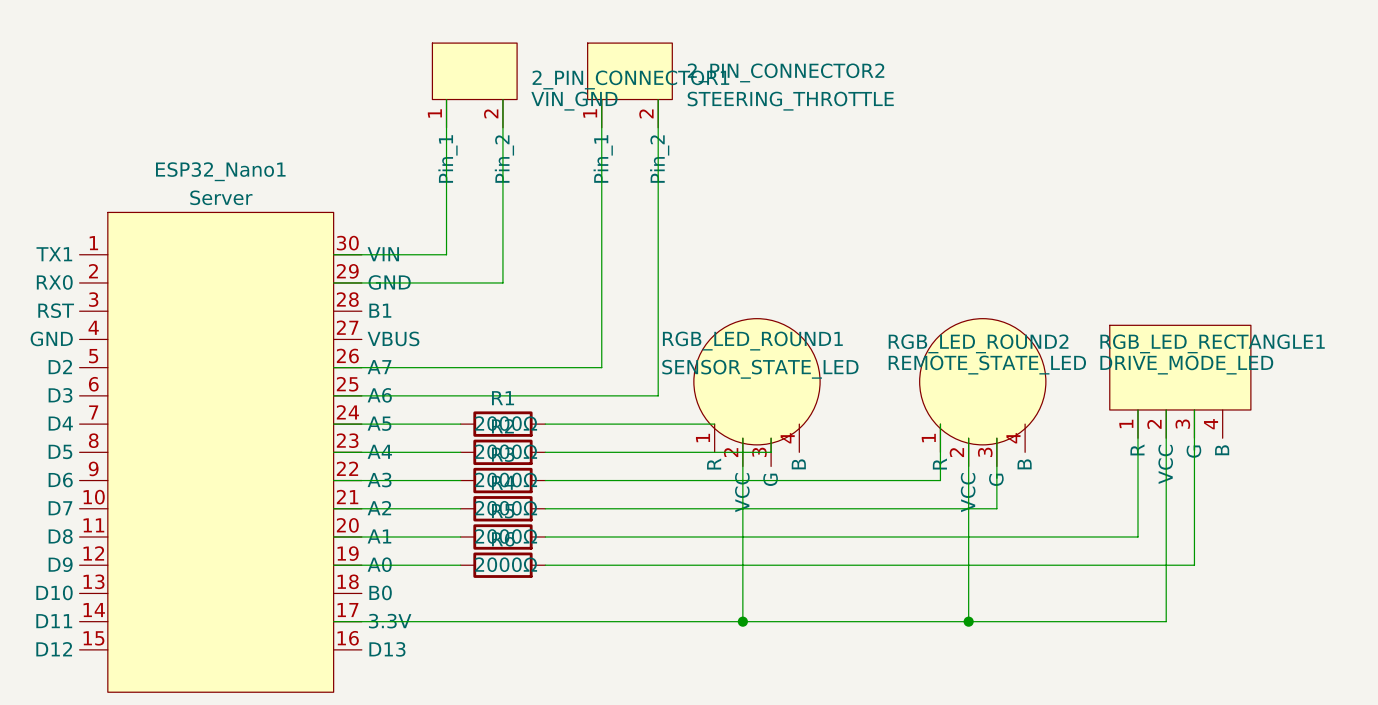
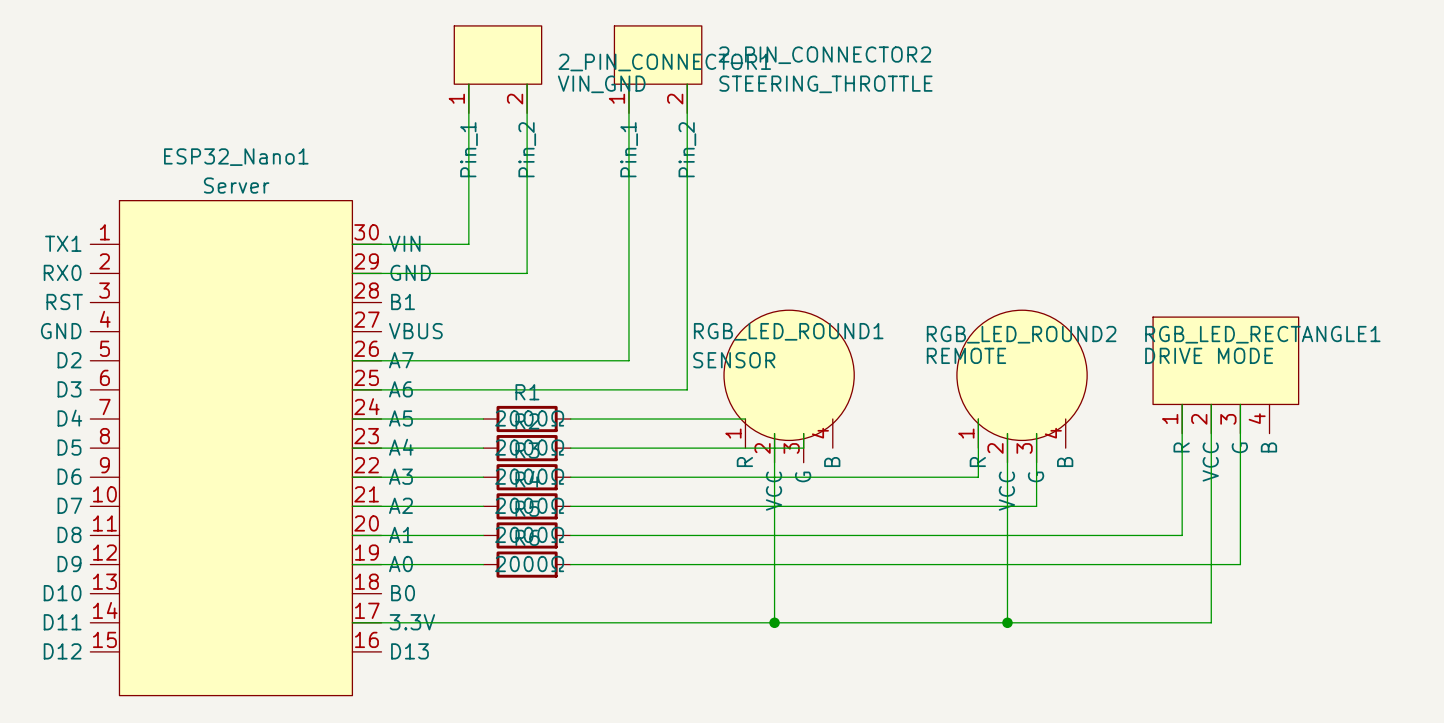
RGB_LED_ROUND2 value: REMOTE_STATE_LED (987, 365) -> REMOTE (966, 355)
RGB_LED_RECTANGLE1 value: DRIVE_MODE_LED (1186, 365) -> DRIVE MODE (1209, 355)
RGB_LED_ROUND1 value: SENSOR_STATE_LED (760, 369) -> SENSOR (734, 360)

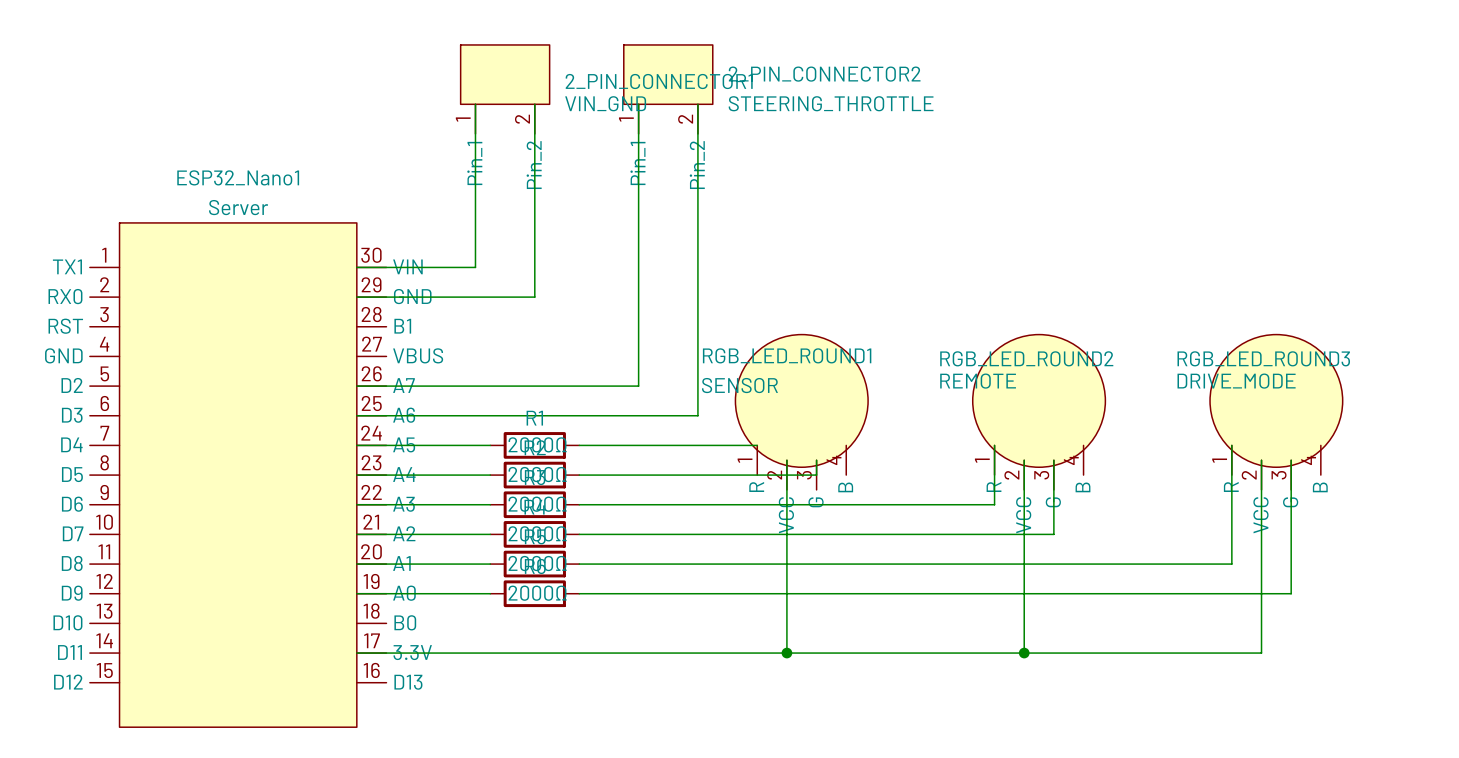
RGB_LED_RECTANGLE1: DRIVE MODE (1225, 375) -> none
RGB_LED_ROUND3: none -> DRIVE_MODE (1276, 412)
wire: (1182, 404) (1182, 535) -> none
wire: none -> (1291, 460) (1291, 593) (1261, 593) (1261, 653) (1231, 653)
wire: (1211, 535) (1211, 622) -> (1231, 564) (1202, 564)

